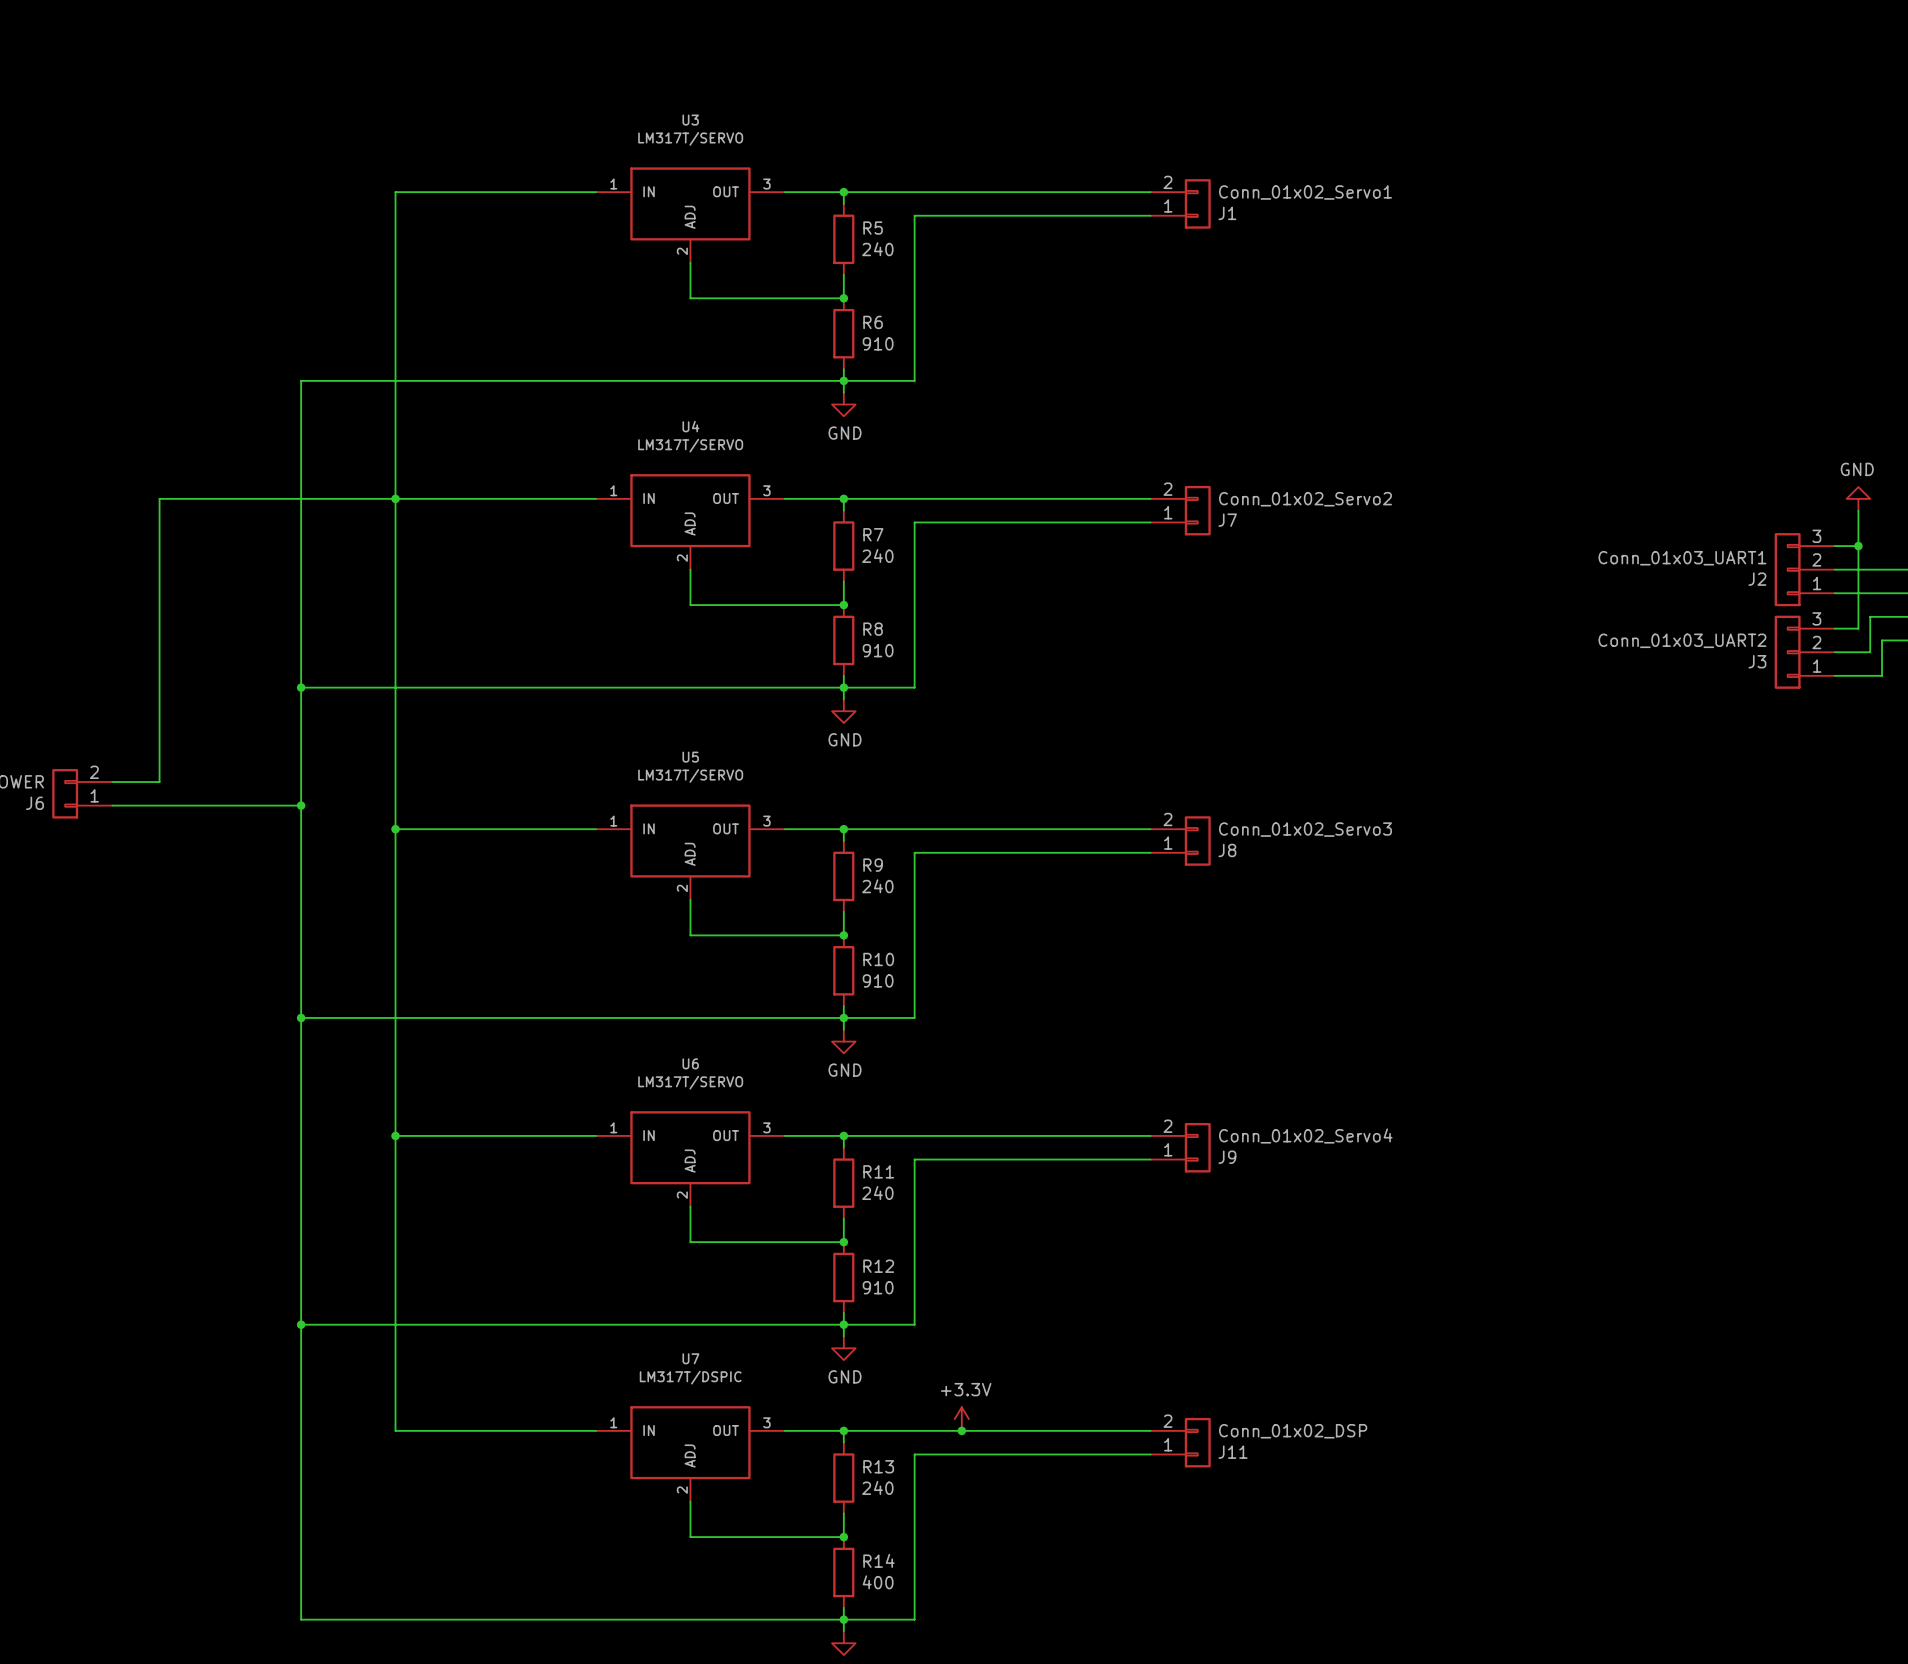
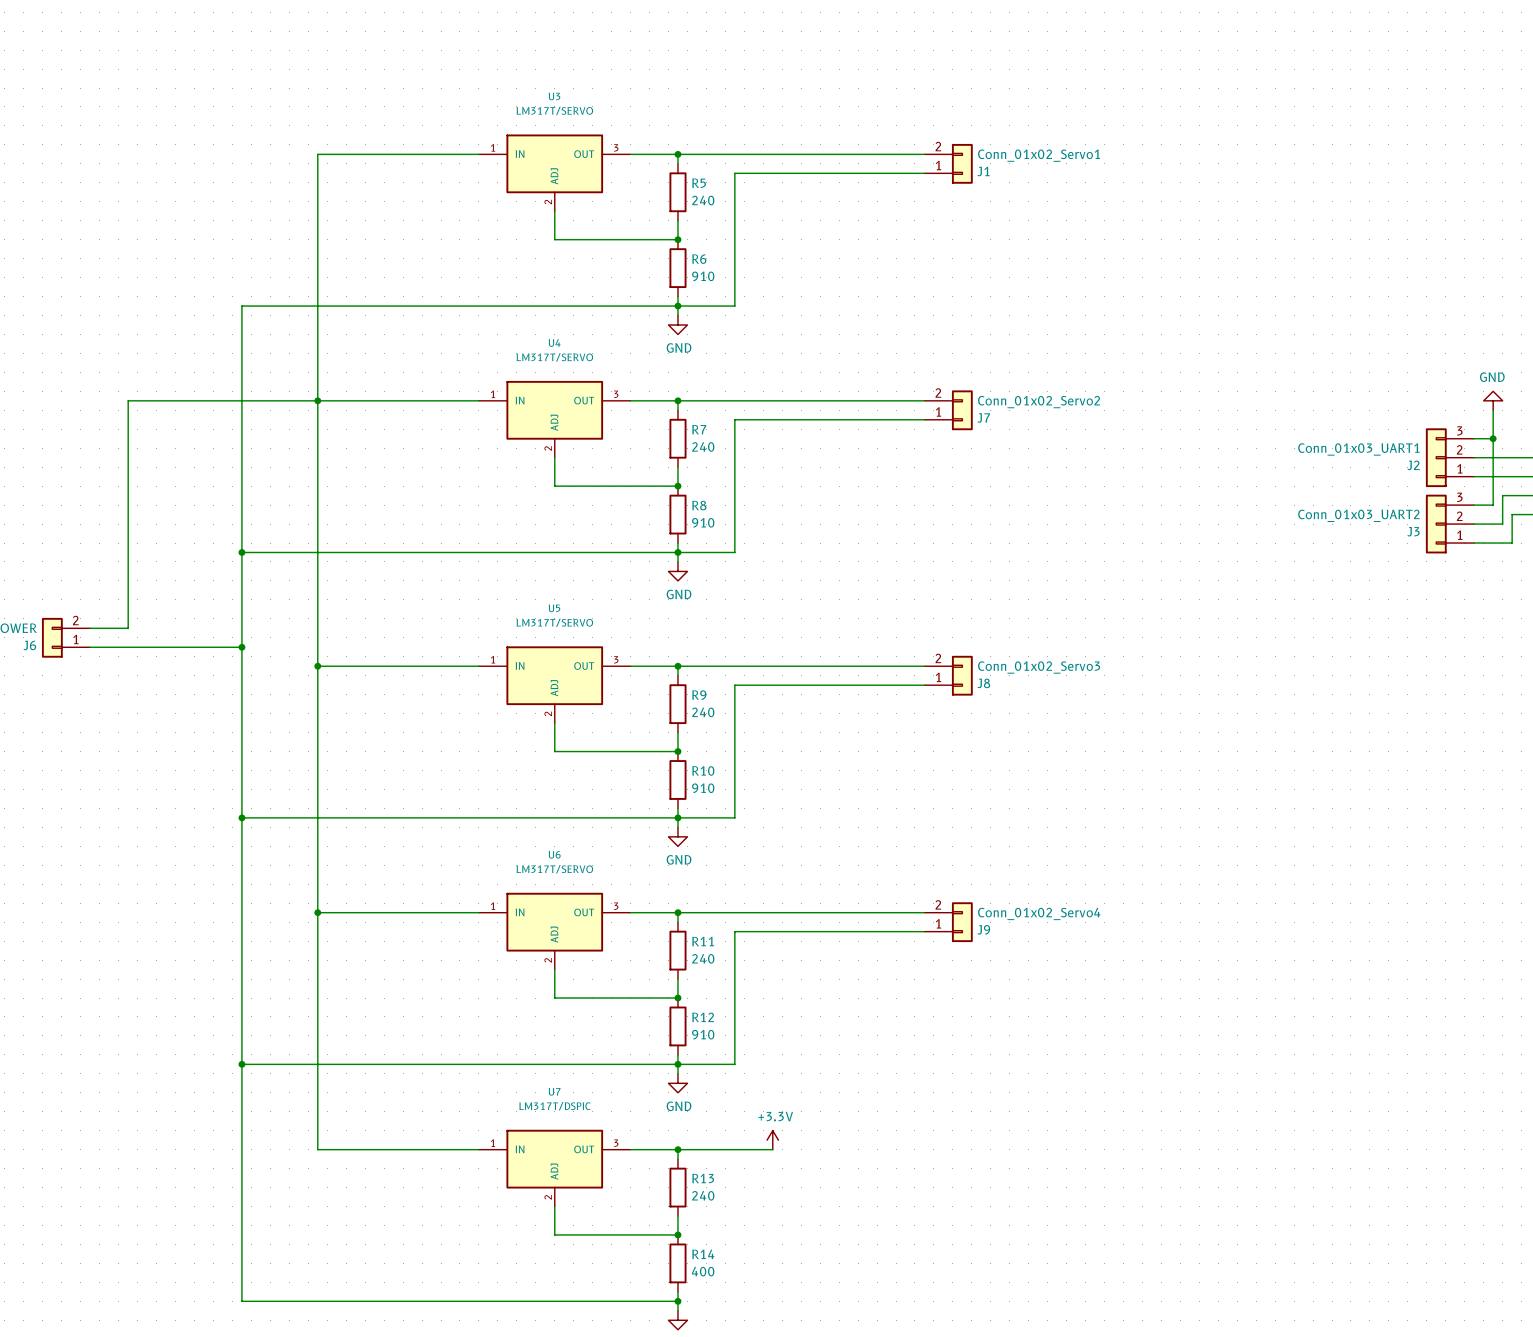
wire: (961, 1430) (1150, 1430) -> none
junction: (961, 1430) -> none
J11: Conn_01x02_DSP (1180, 1442) -> none
wire: (1150, 1454) (914, 1454) (914, 1619) (843, 1619) -> none

